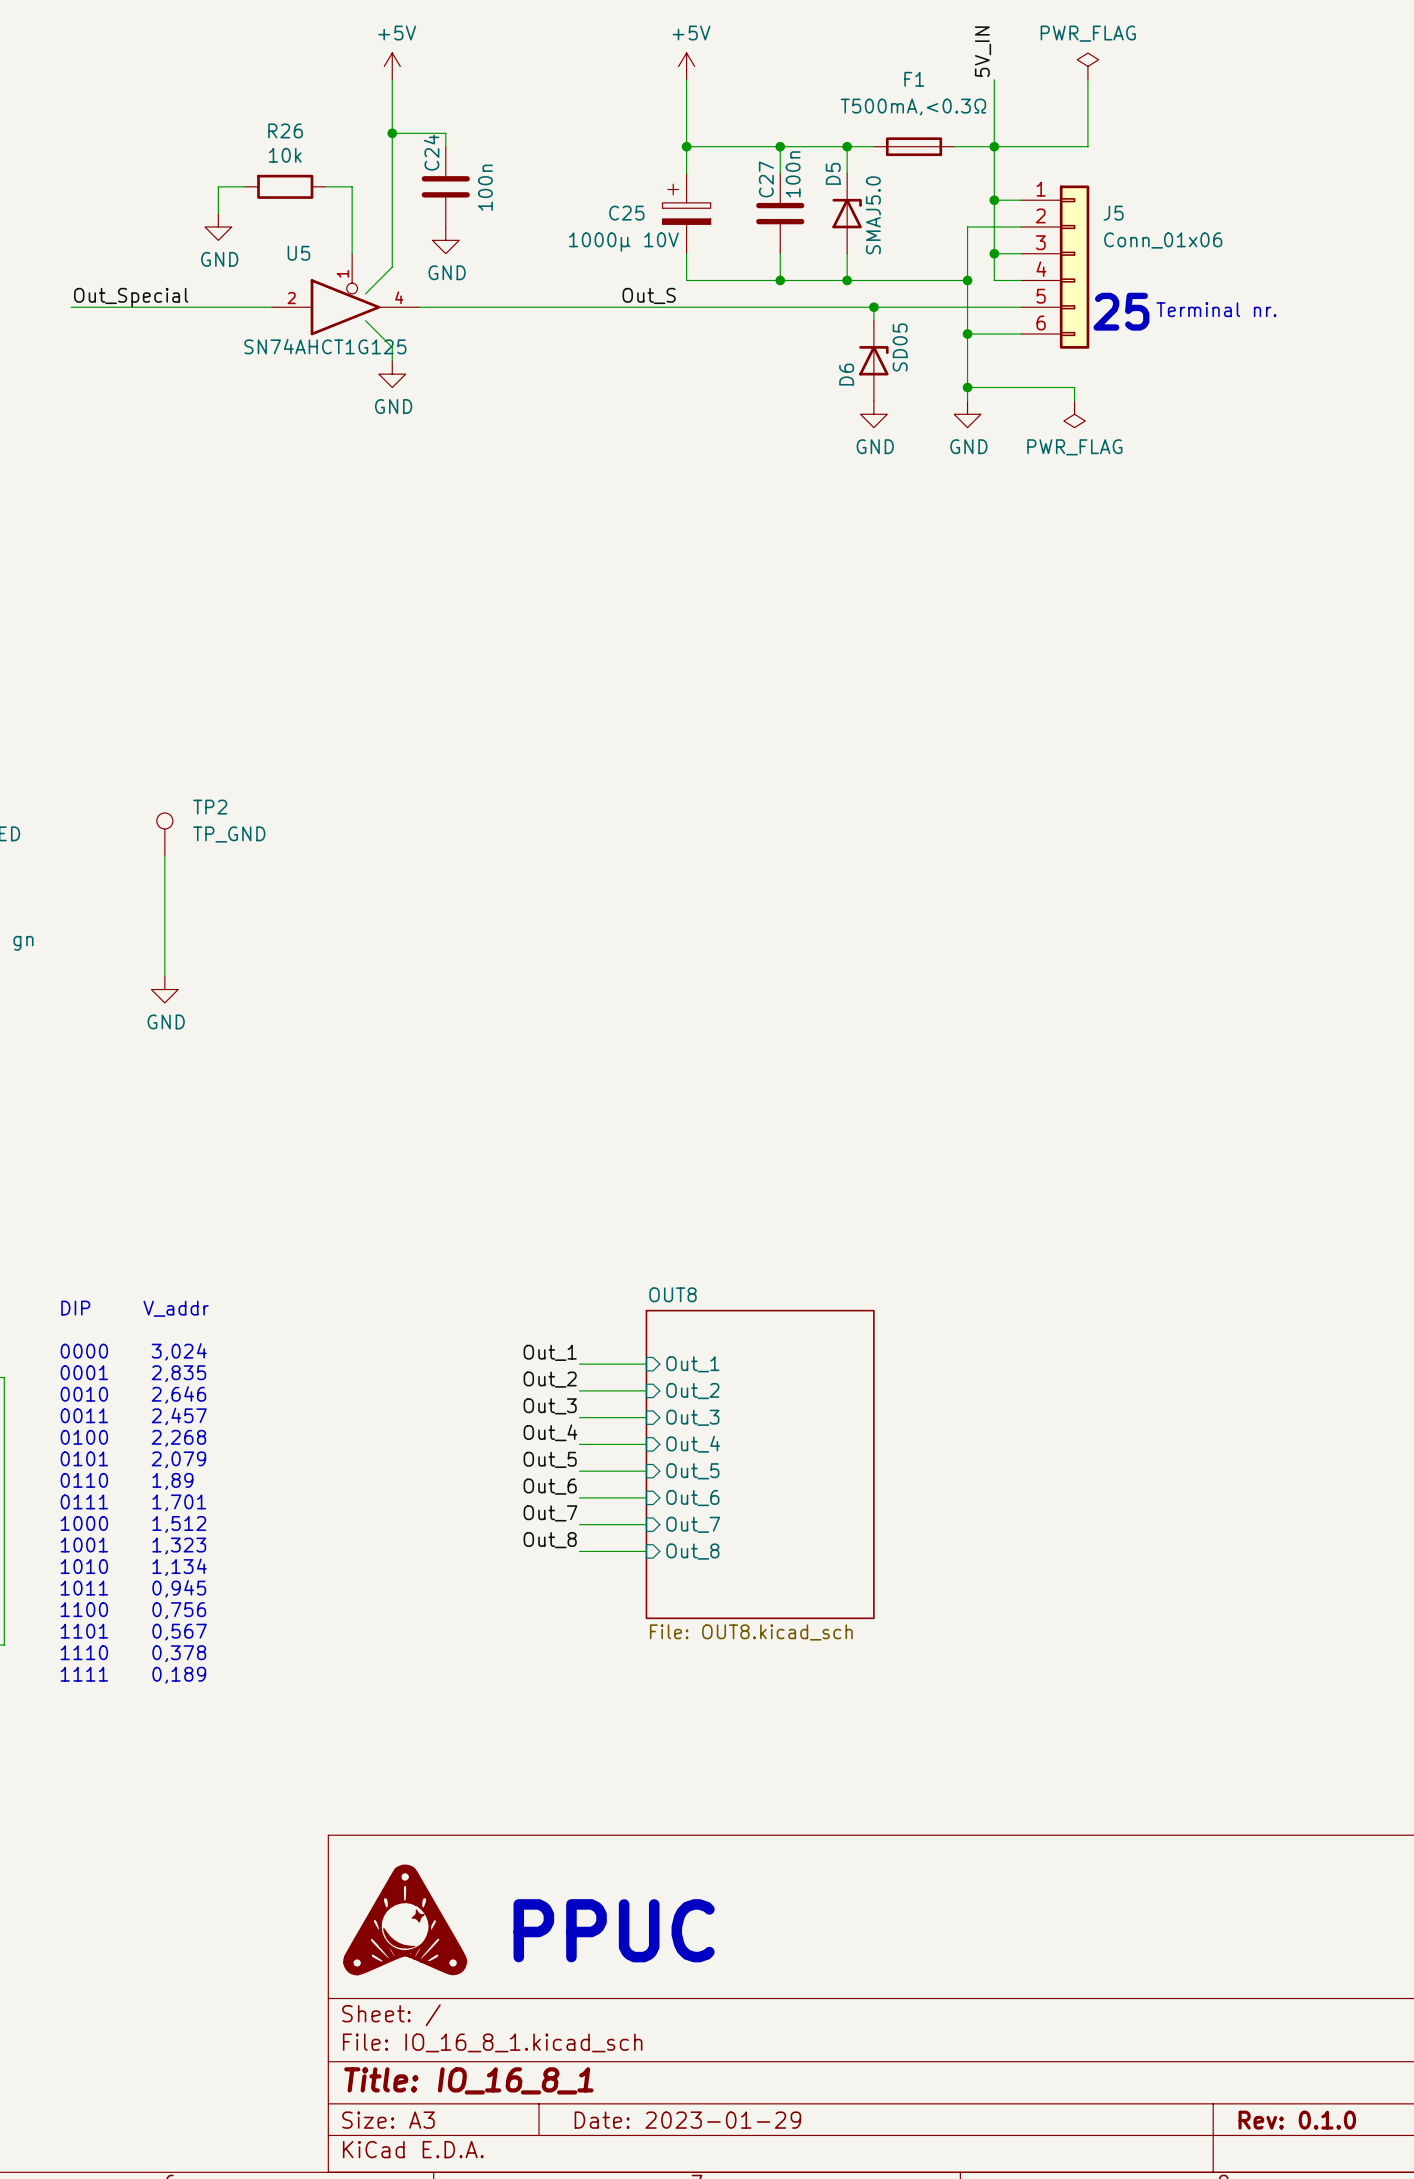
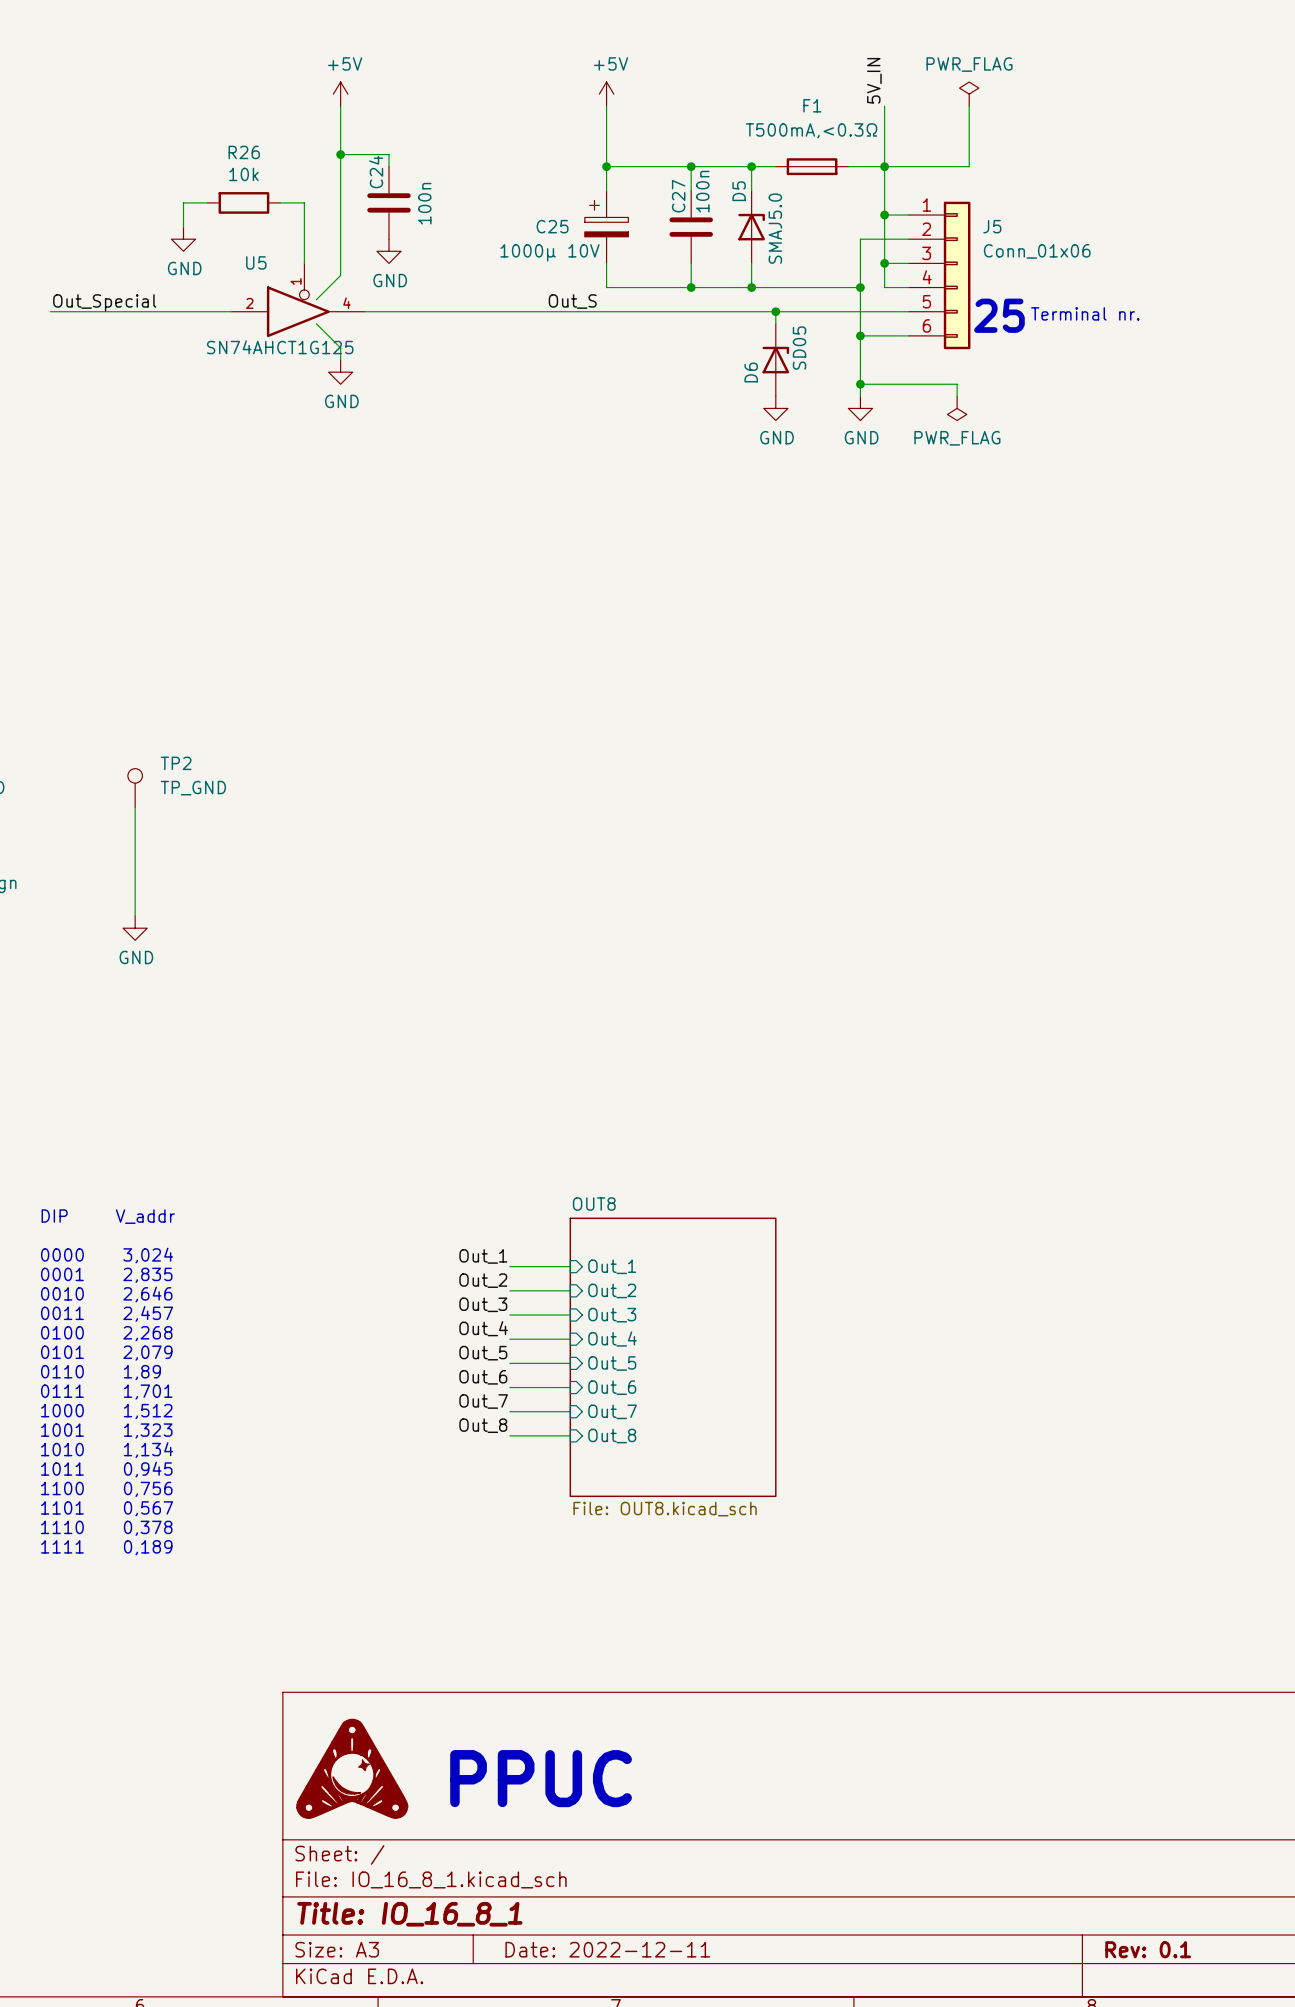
title block: Date: 2023-01-29 (687, 2120) -> Date: 2022-12-11 (607, 1949)
title block: Rev: 0.1.0 (1297, 2120) -> Rev: 0.1 (1148, 1949)

